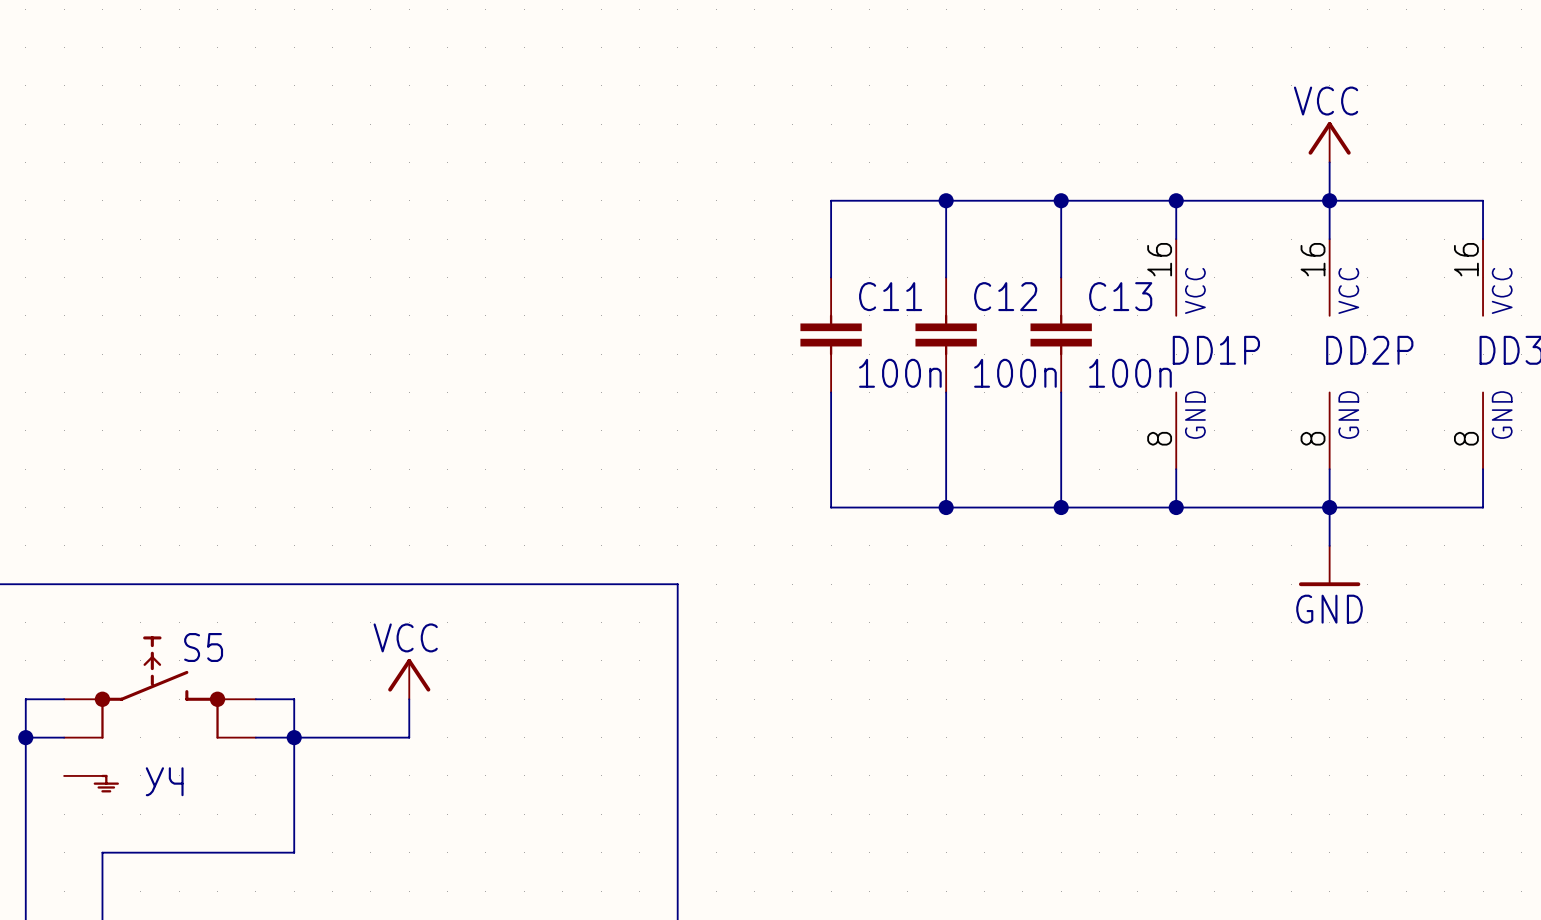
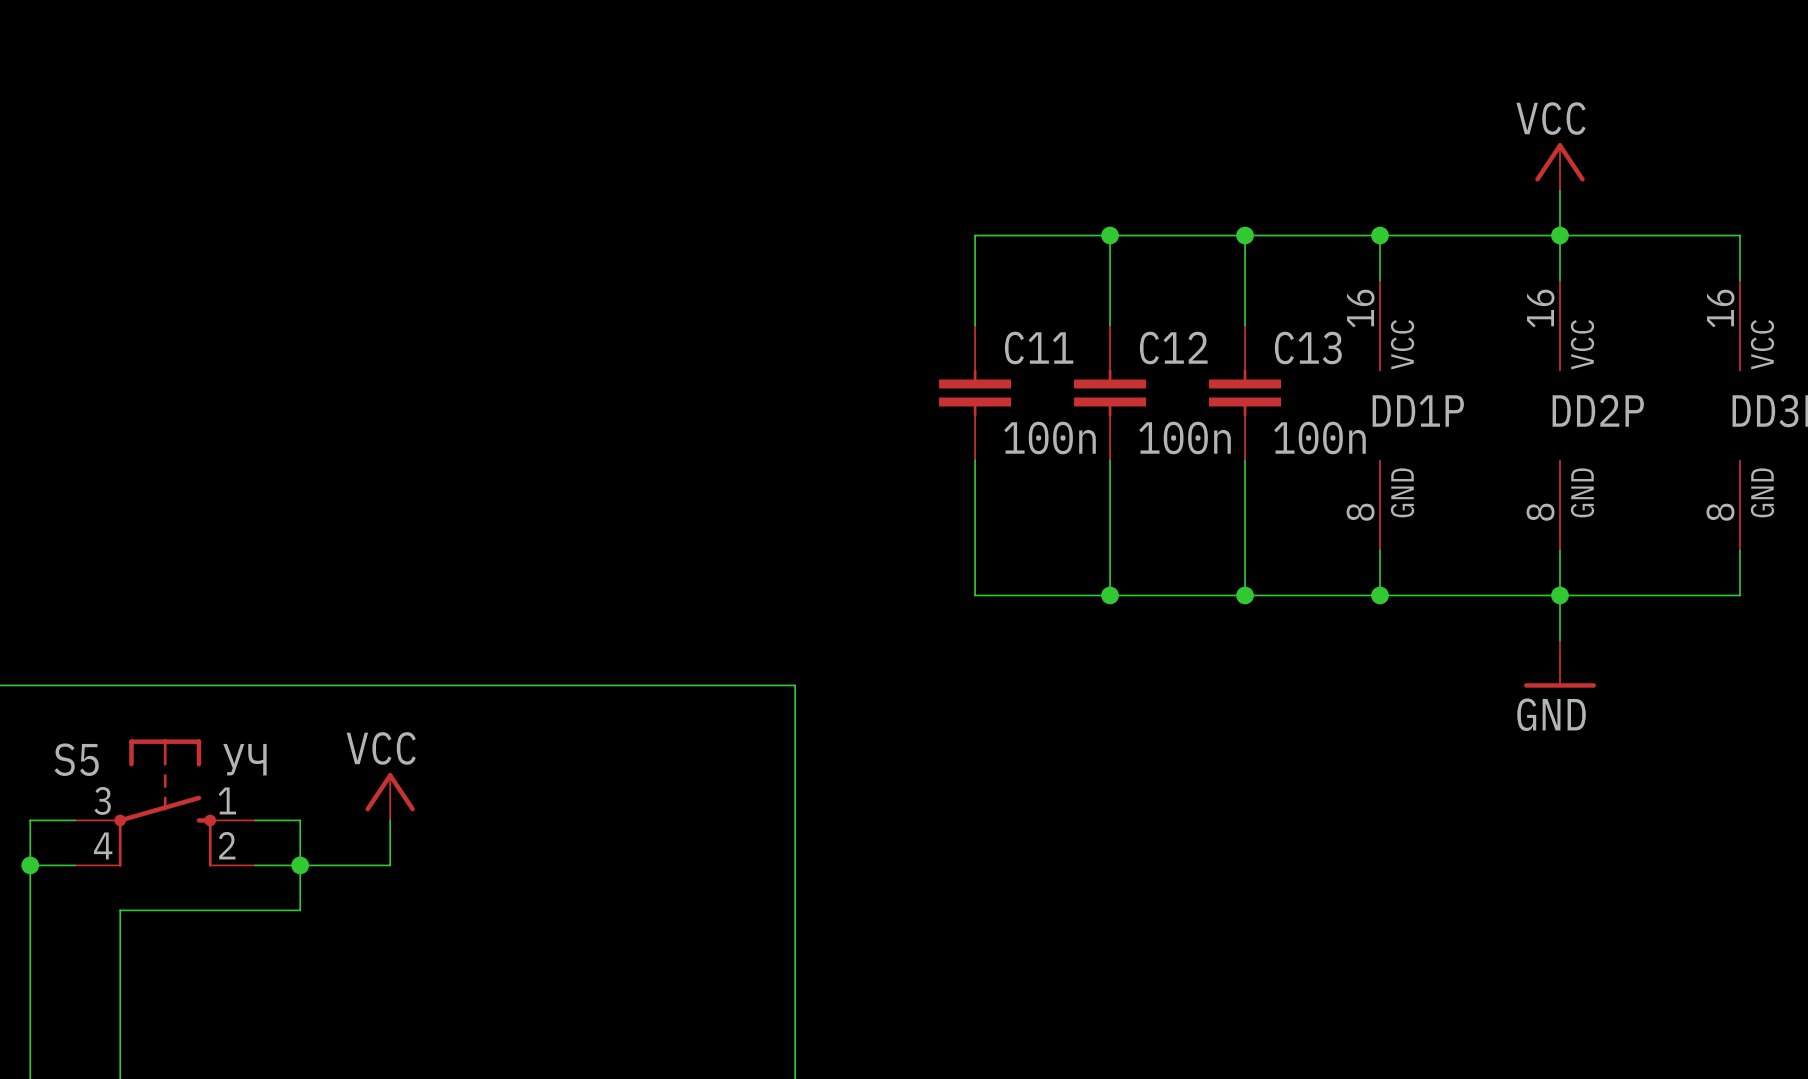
S5 symbol: [64, 636, 256, 793] -> [75, 739, 256, 867]
S5 name position: S5 (203, 647) -> S5 (76, 759)
power symbol position: VCC (409, 679) -> VCC (390, 796)
wire: (255, 699) (294, 699) (294, 852) (102, 852) -> (255, 820) (300, 820) (300, 910) (120, 910) (120, 1000)
wire: (409, 699) (409, 737) (332, 737) -> (390, 820) (390, 865)
junction position: (294, 737) -> (300, 865)
S5 value position: УЧ (164, 781) -> УЧ (244, 759)

